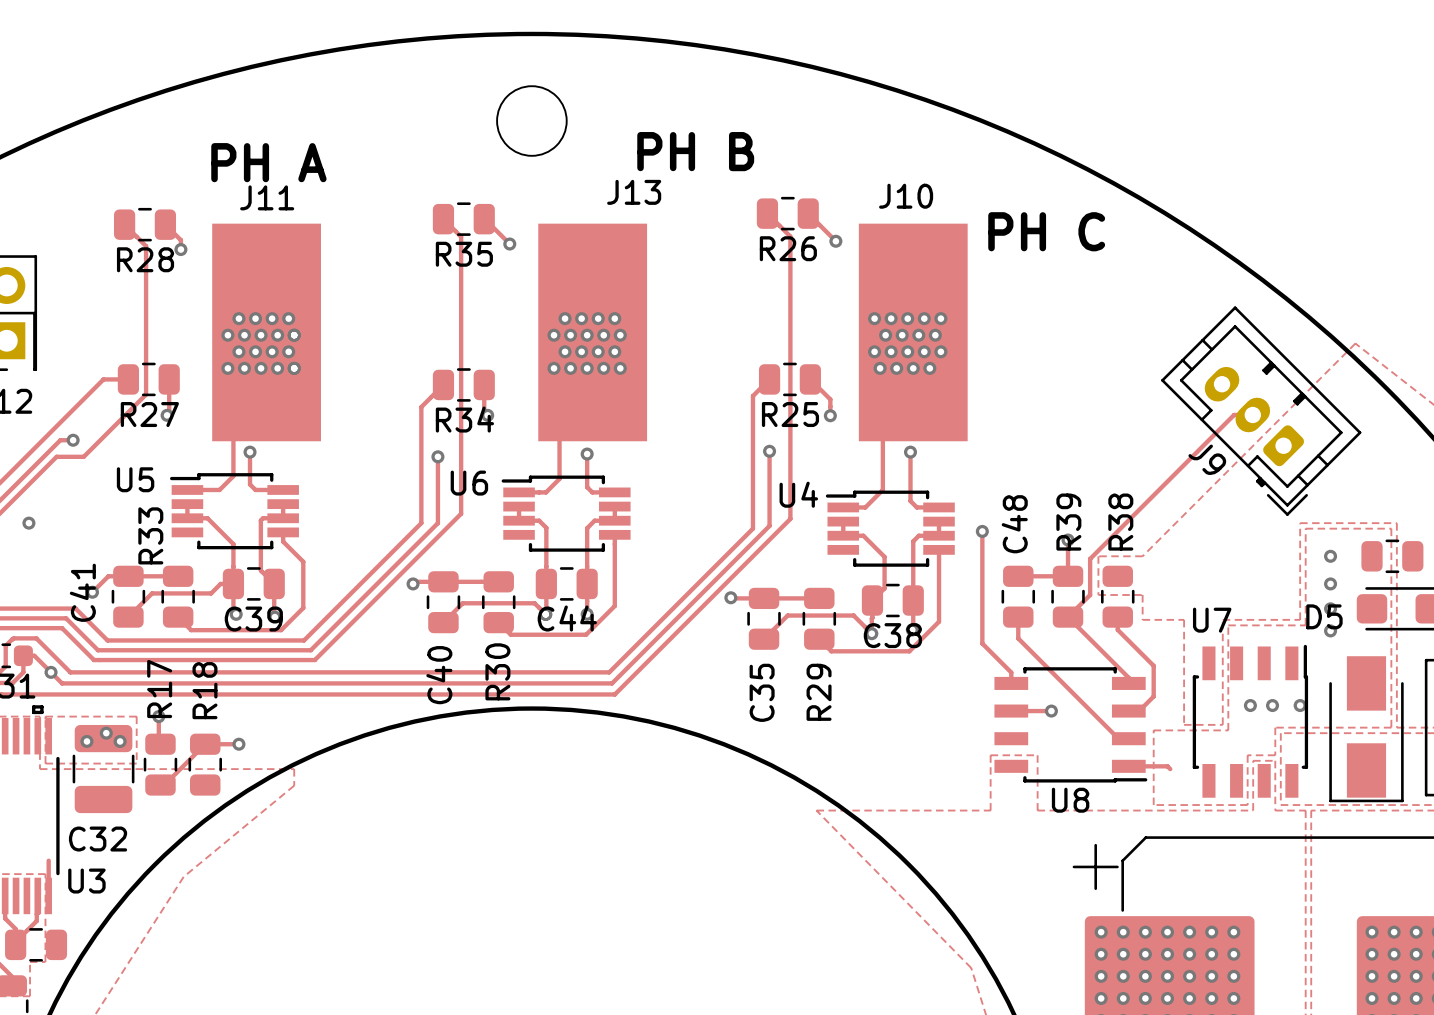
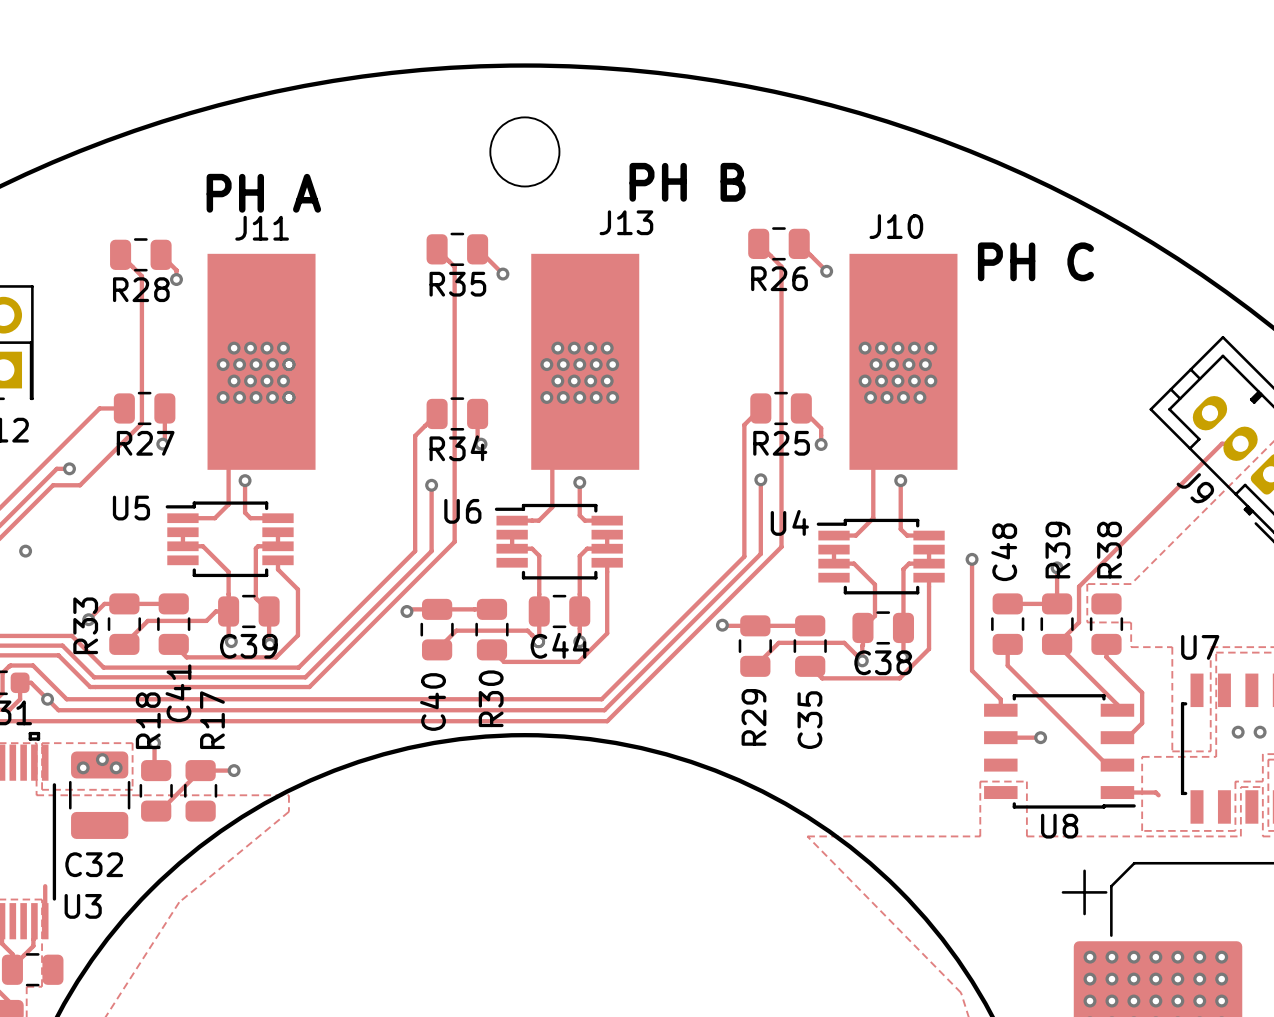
R33 name position: R33 (150, 535) -> R33 (85, 625)
C41 name position: C41 (82, 592) -> C41 (178, 693)
R17 name position: R17 (159, 689) -> R17 (212, 720)
R18 name position: R18 (204, 690) -> R18 (148, 720)
C35 name position: C35 (762, 692) -> C35 (809, 720)
R29 name position: R29 (819, 692) -> R29 (753, 717)

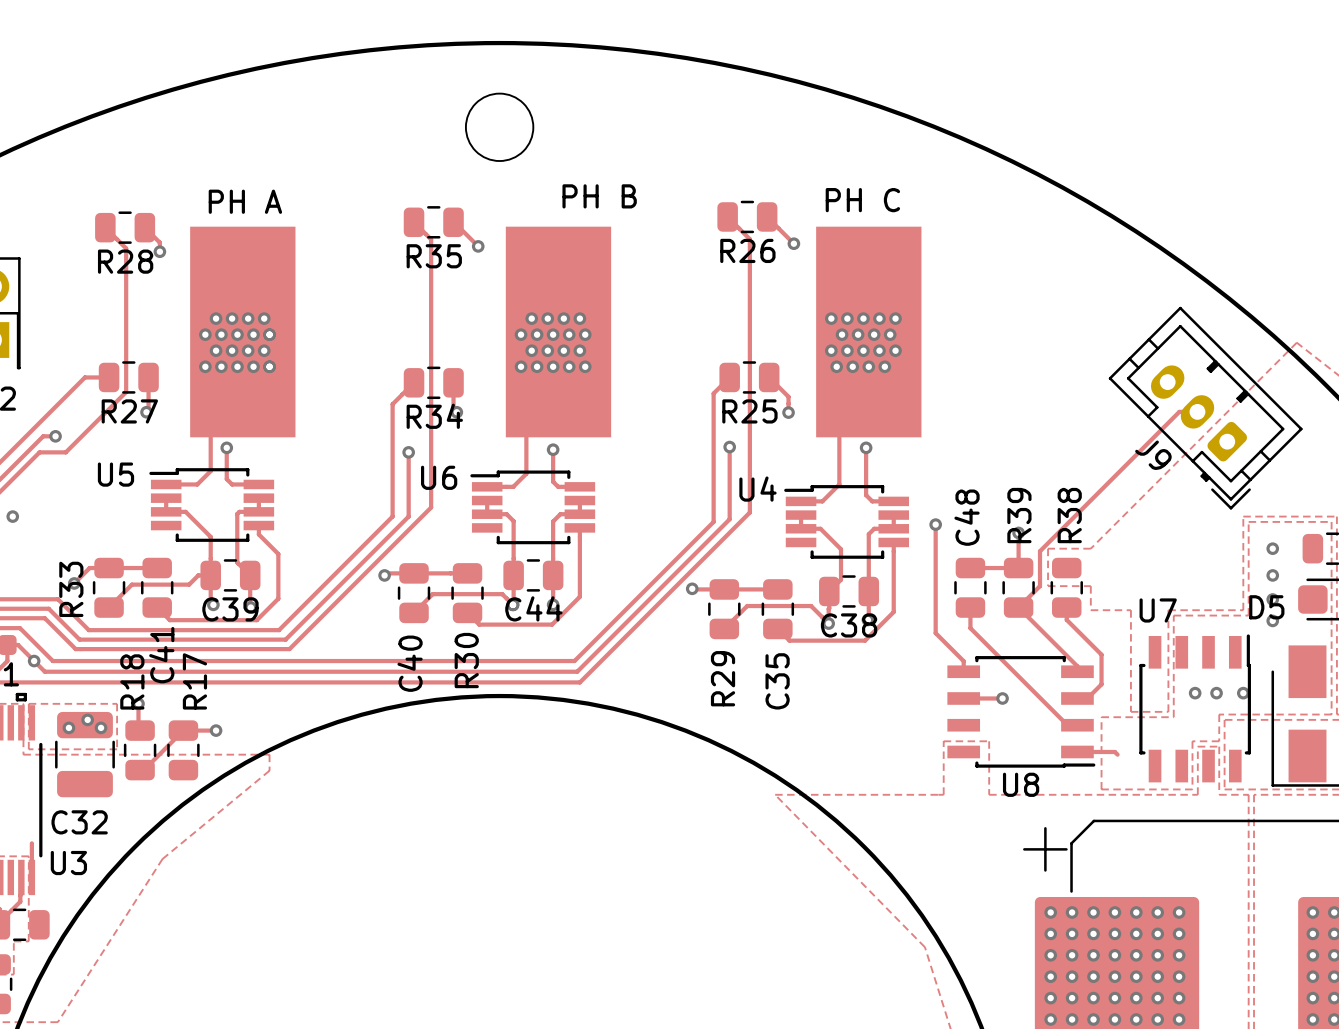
text: PH B (687, 182) -> none
text: PH A (263, 193) -> none
J13 name: J13 (626, 222) -> PH B (599, 196)
J10 name: J10 (896, 226) -> PH C (862, 200)
J11 name: J11 (262, 228) -> PH A (245, 201)
text: PH C (1035, 261) -> none

